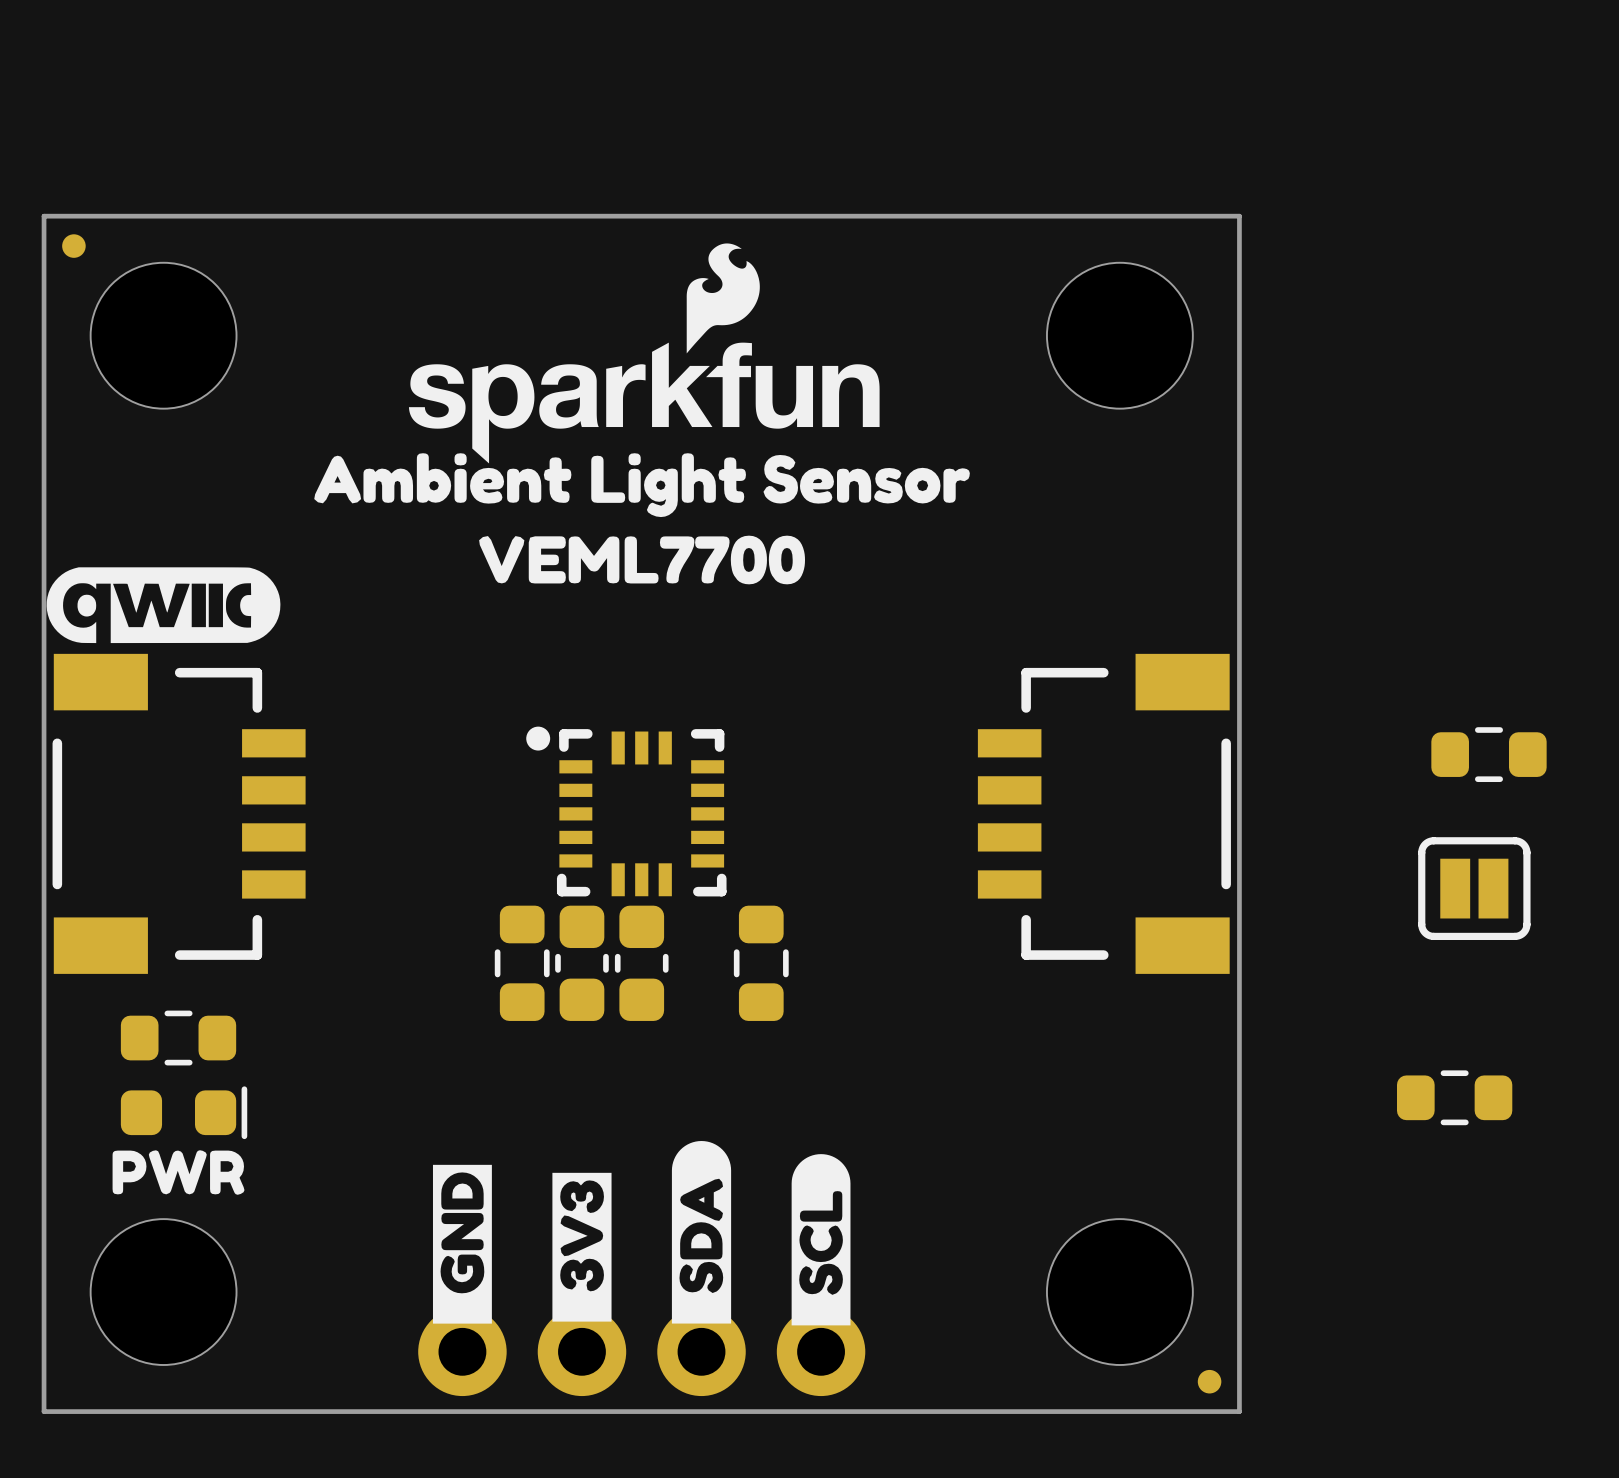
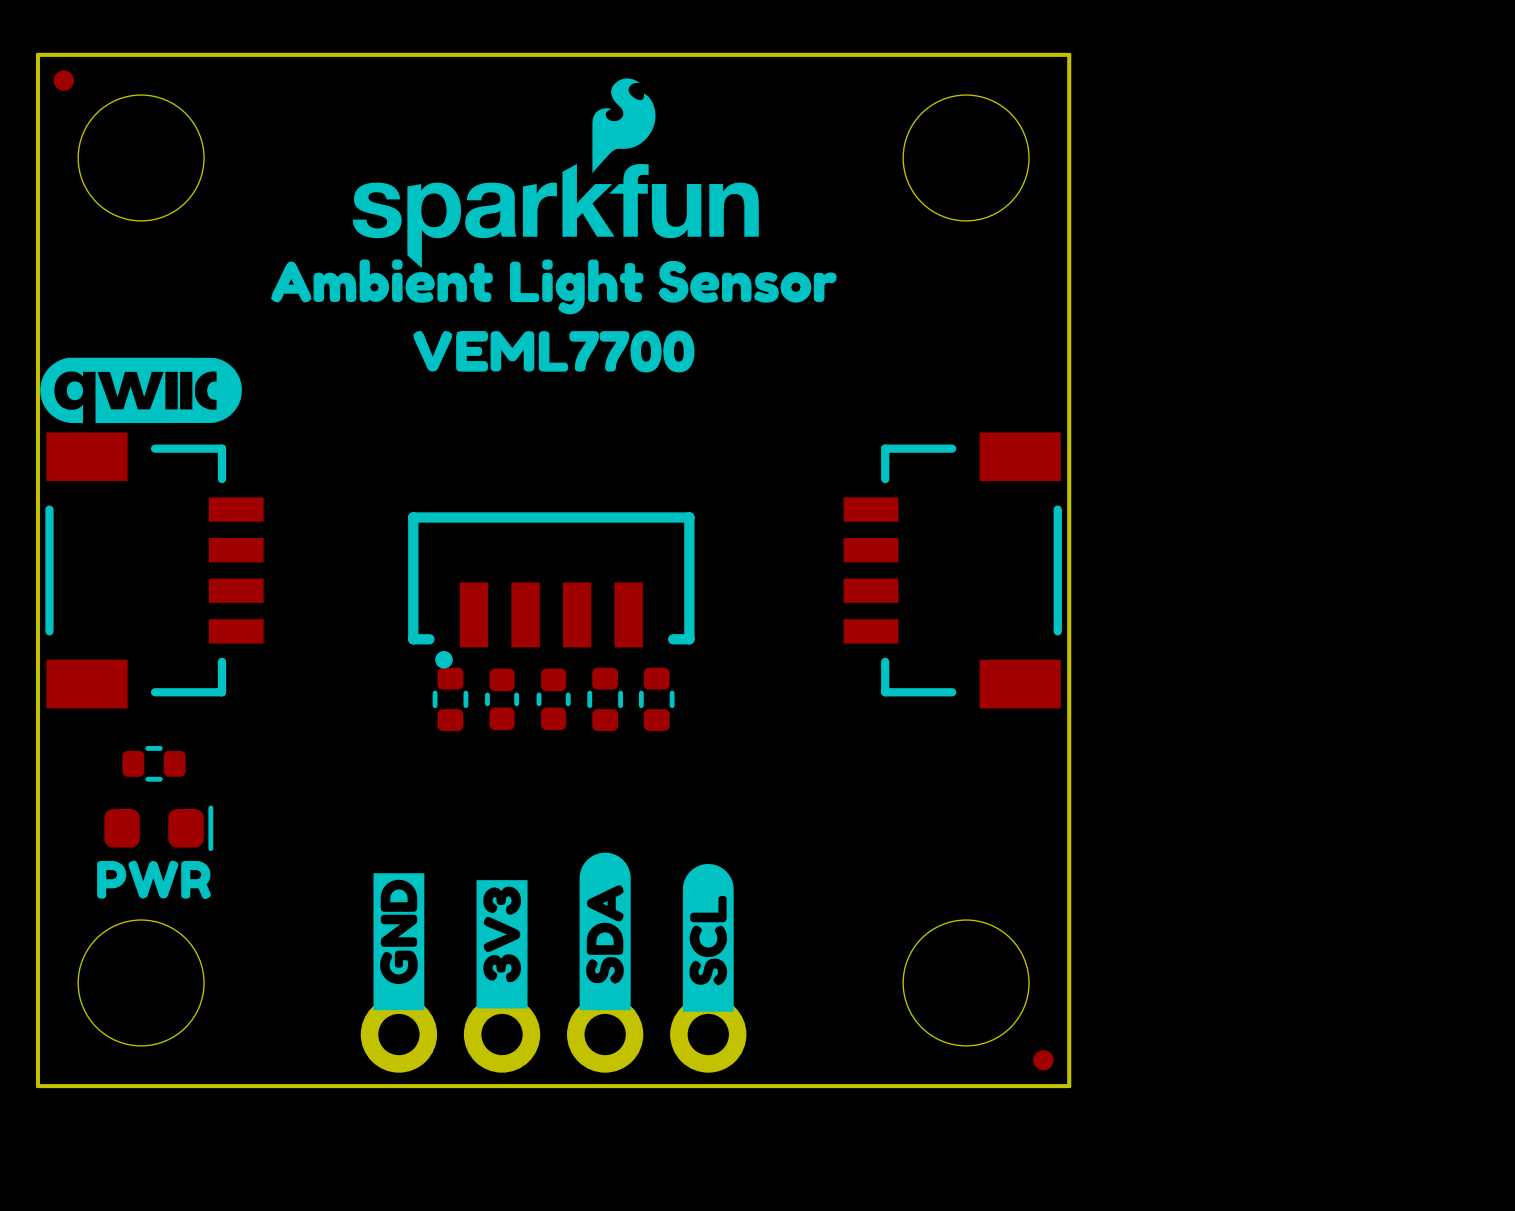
part footprint: [526, 726, 727, 897] -> [408, 512, 695, 669]
part: (1488, 754) -> none
part: (1474, 888) -> none
part footprint: [494, 905, 550, 1021] -> [432, 667, 469, 732]
part footprint: [555, 905, 609, 1021] -> [484, 668, 520, 731]
part footprint: [614, 905, 669, 1021] -> [536, 668, 571, 731]
part footprint: [733, 905, 789, 1021] -> [638, 667, 675, 732]
part: none -> (605, 699)
part footprint: [120, 1010, 237, 1066] -> [122, 745, 186, 782]
part: (1454, 1097) -> none

